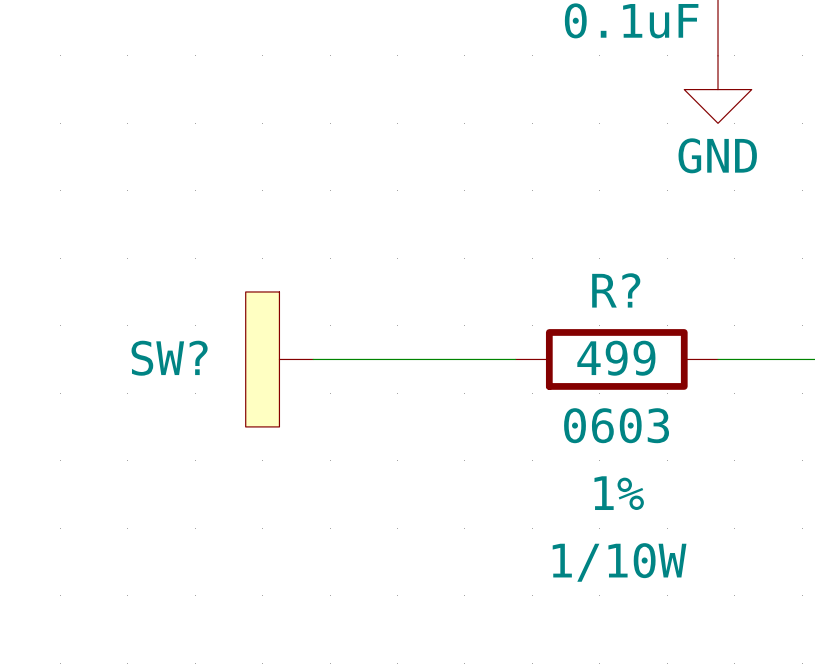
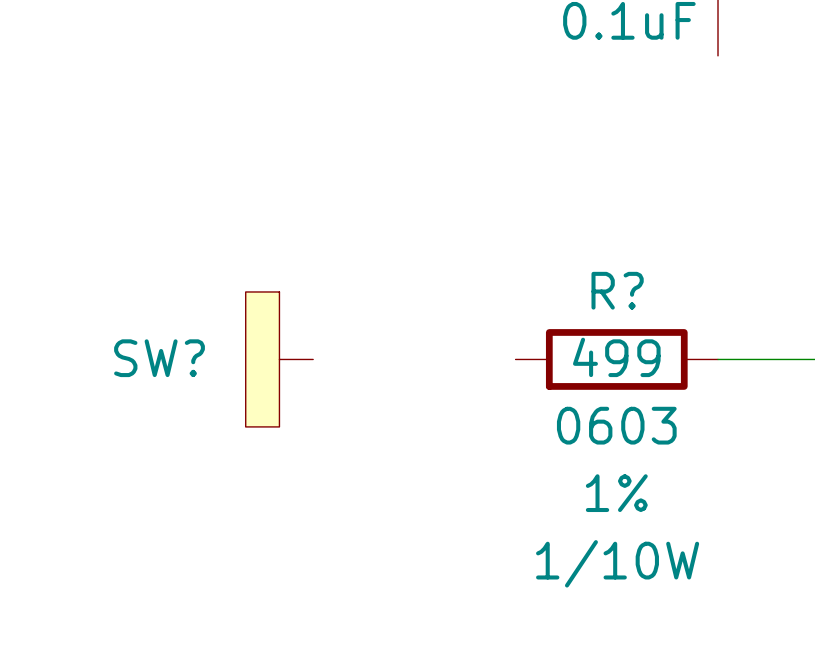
power symbol: GND (718, 89) -> none
wire: (313, 359) (515, 359) -> none

